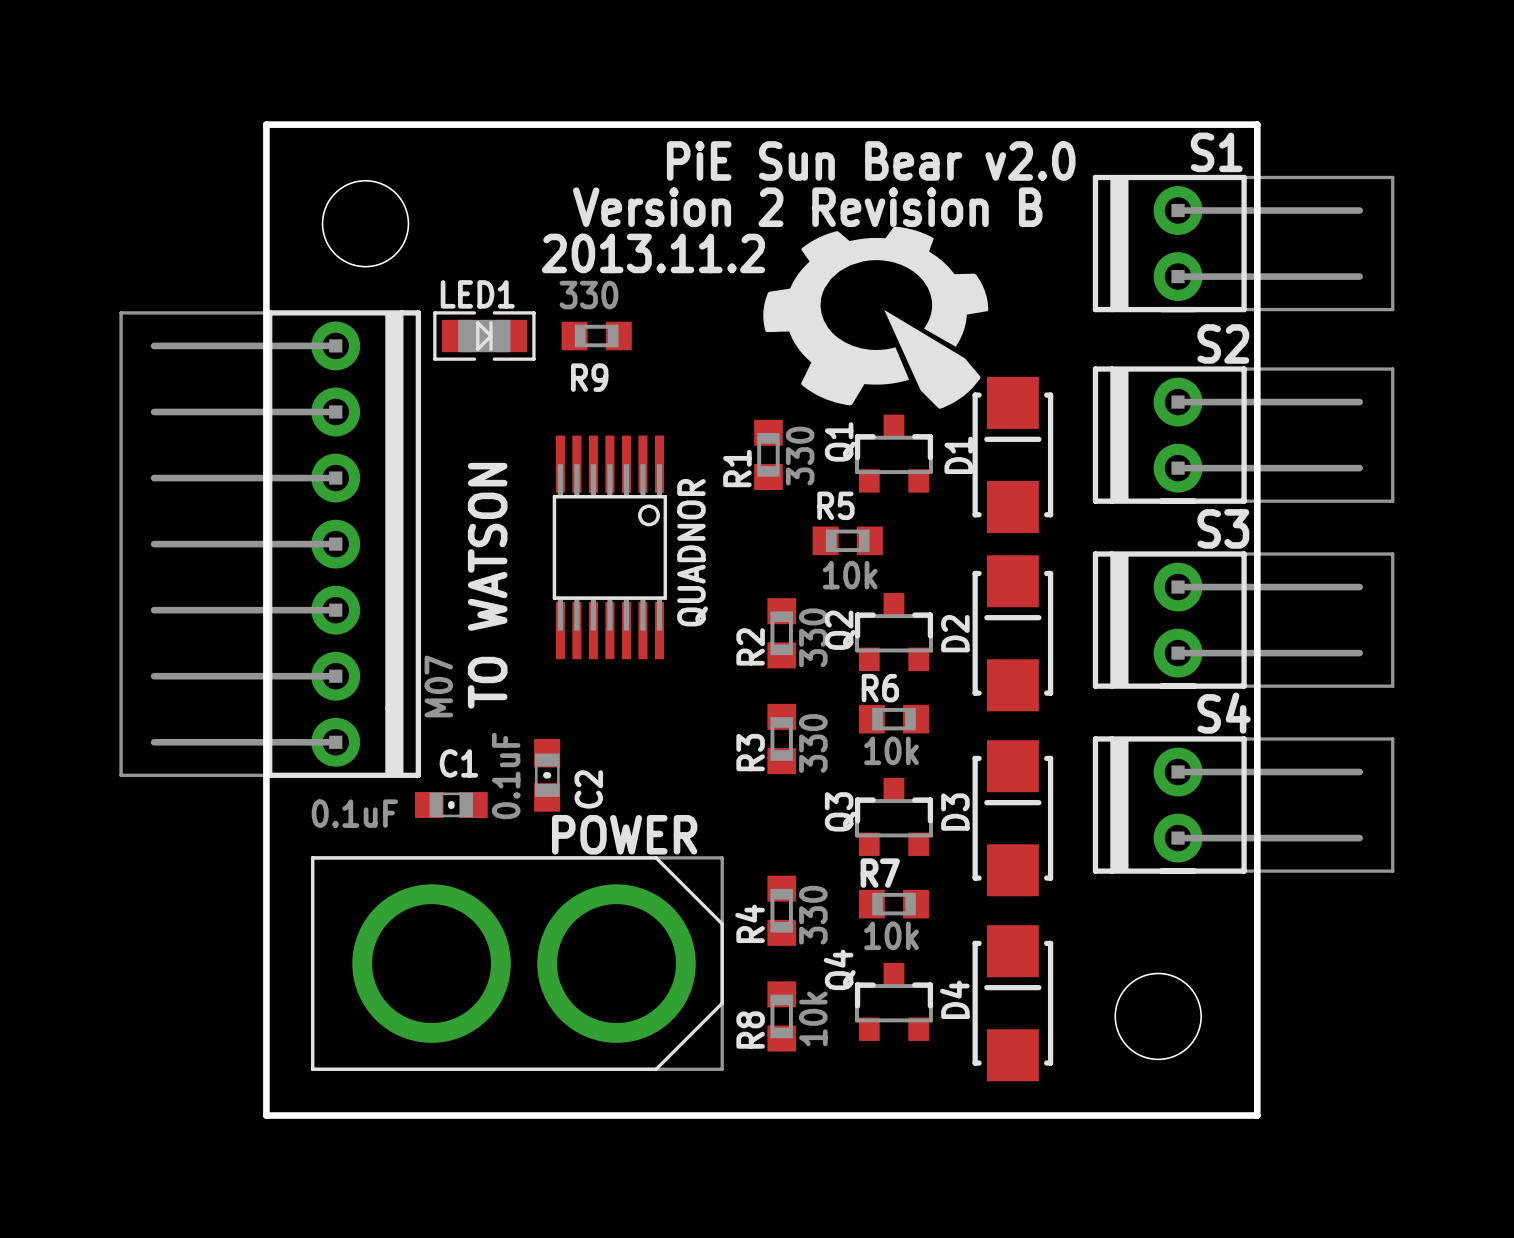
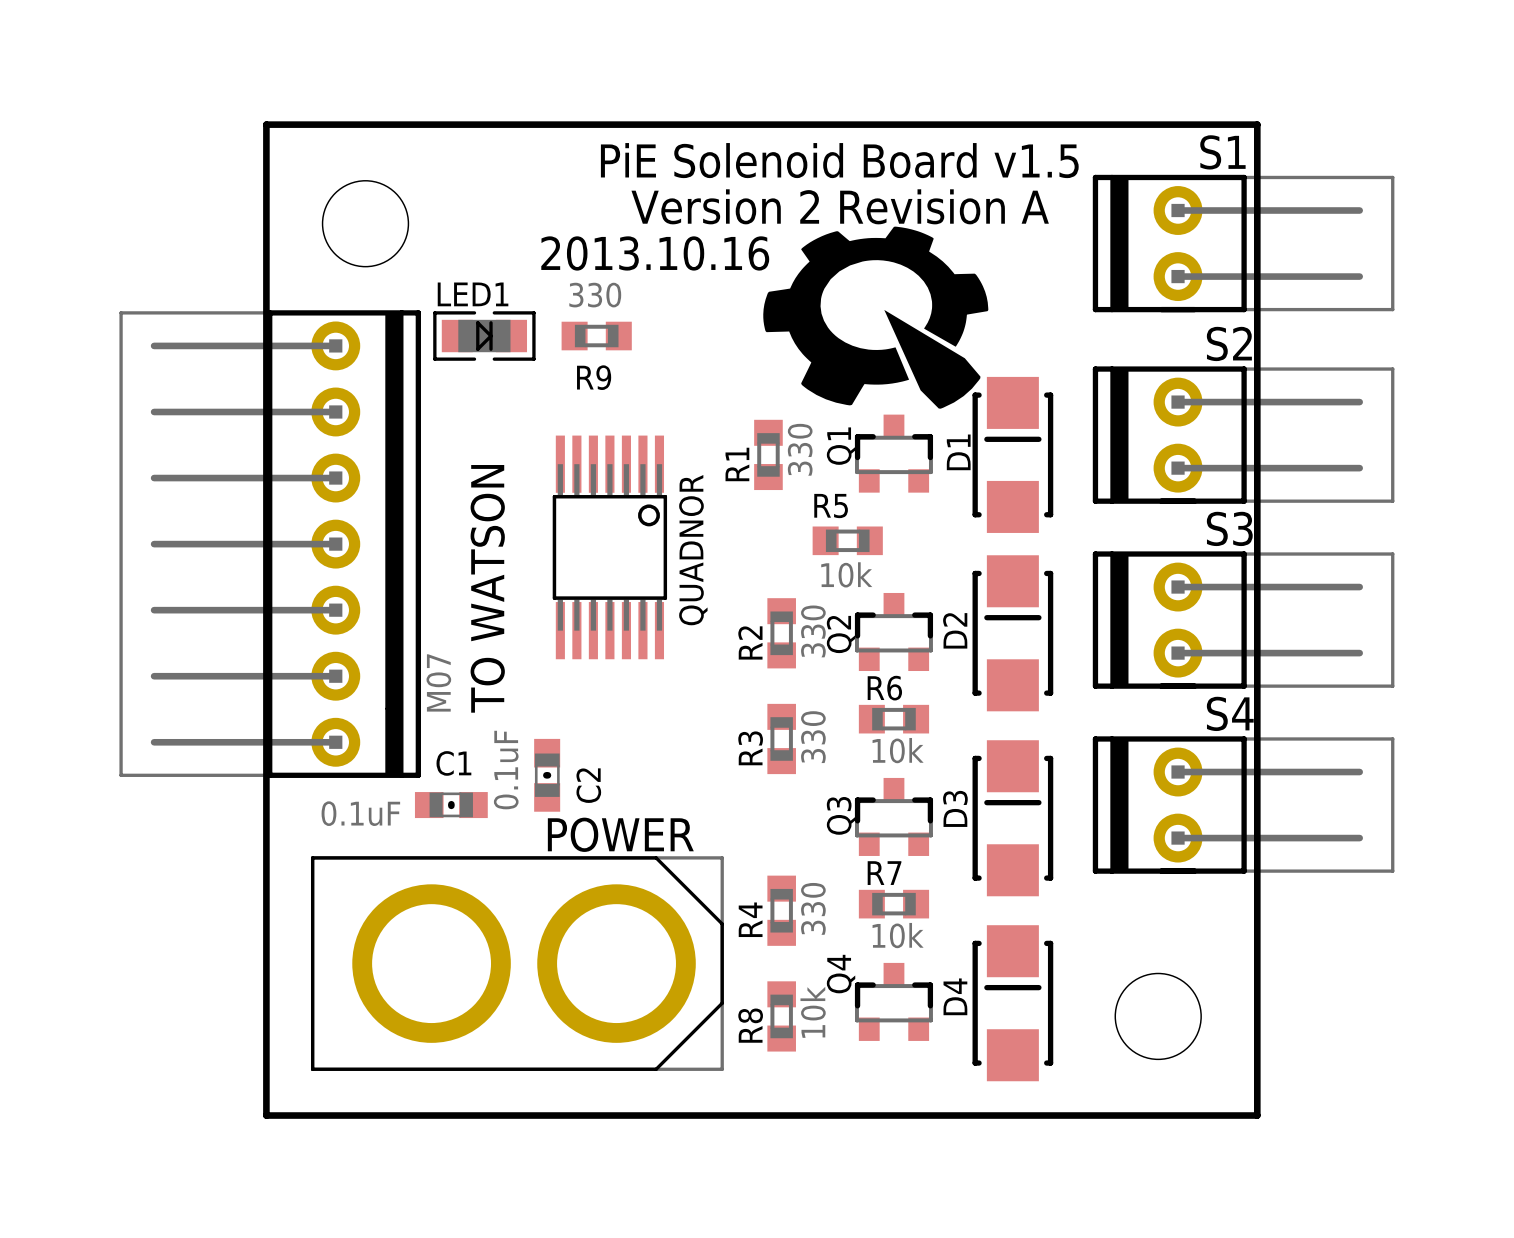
text: PiE Sun Bear v2.0 (871, 160) -> PiE Solenoid Board v1.5 (839, 160)
text: Version 2 Revision B (807, 207) -> Version 2 Revision A (840, 206)
text: 2013.11.2 (653, 253) -> 2013.10.16 (655, 253)

